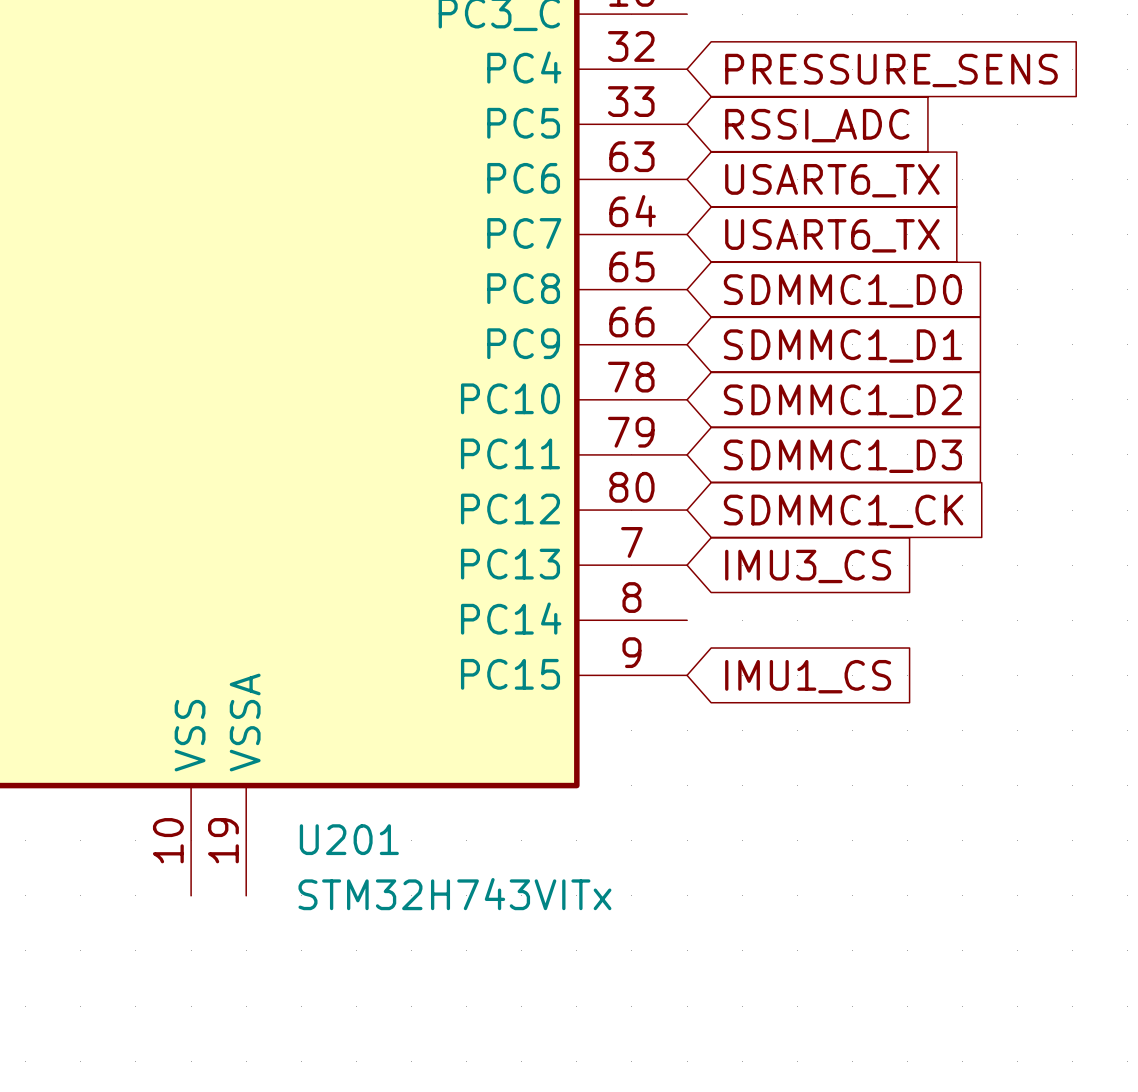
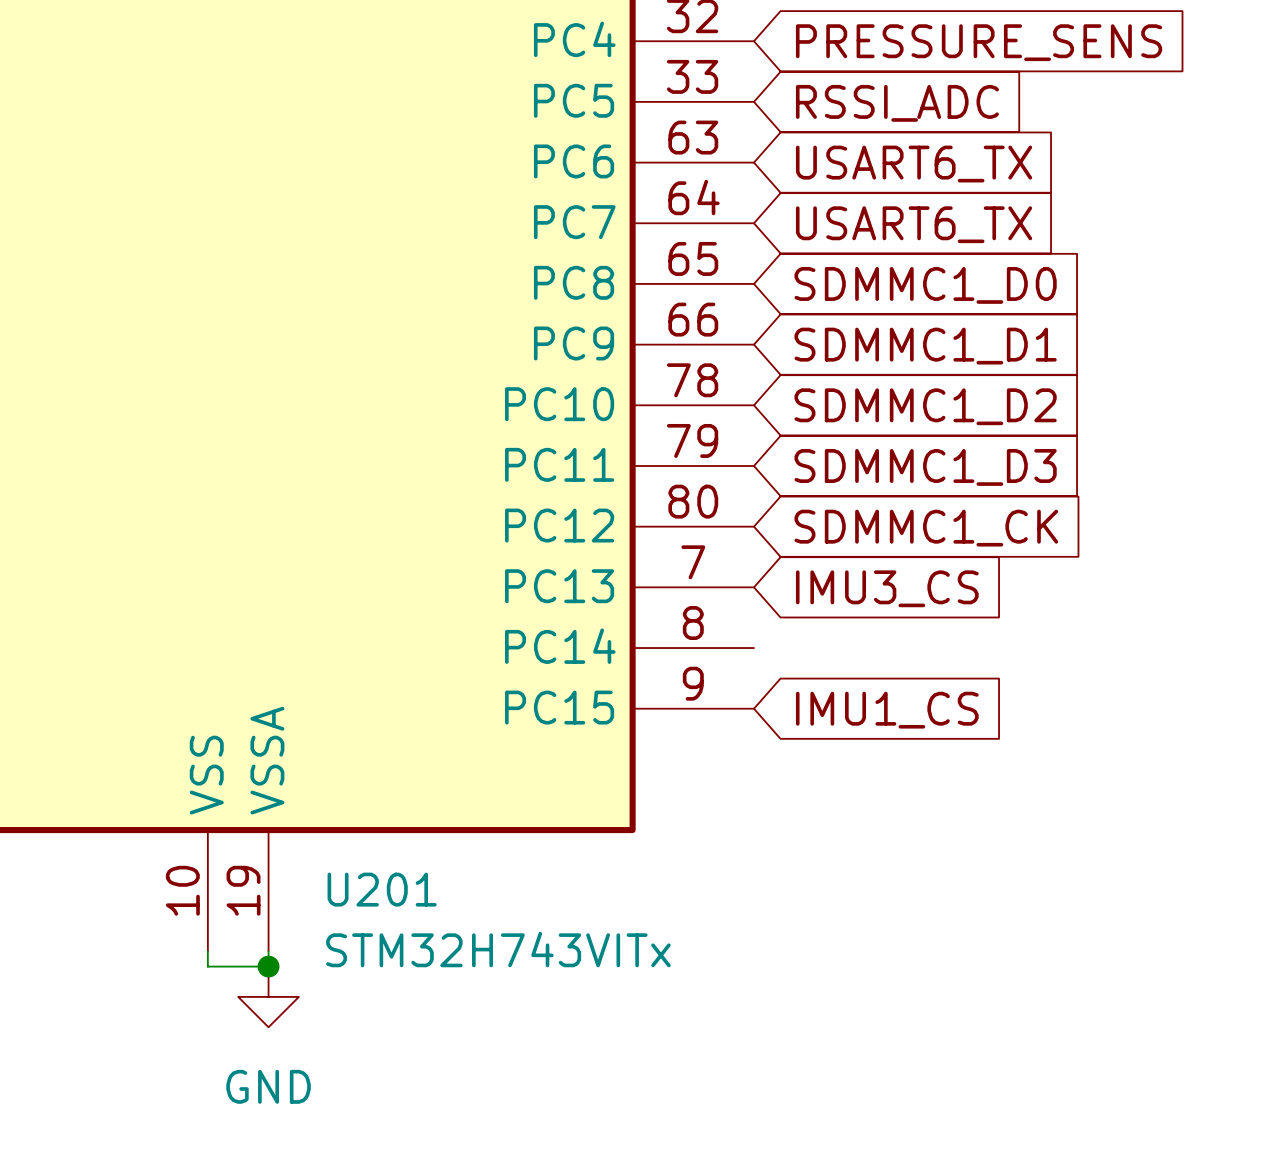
wire: none -> (207, 951) (207, 966) (268, 966) (268, 951)
junction: none -> (268, 966)
power symbol: none -> GND (268, 996)

